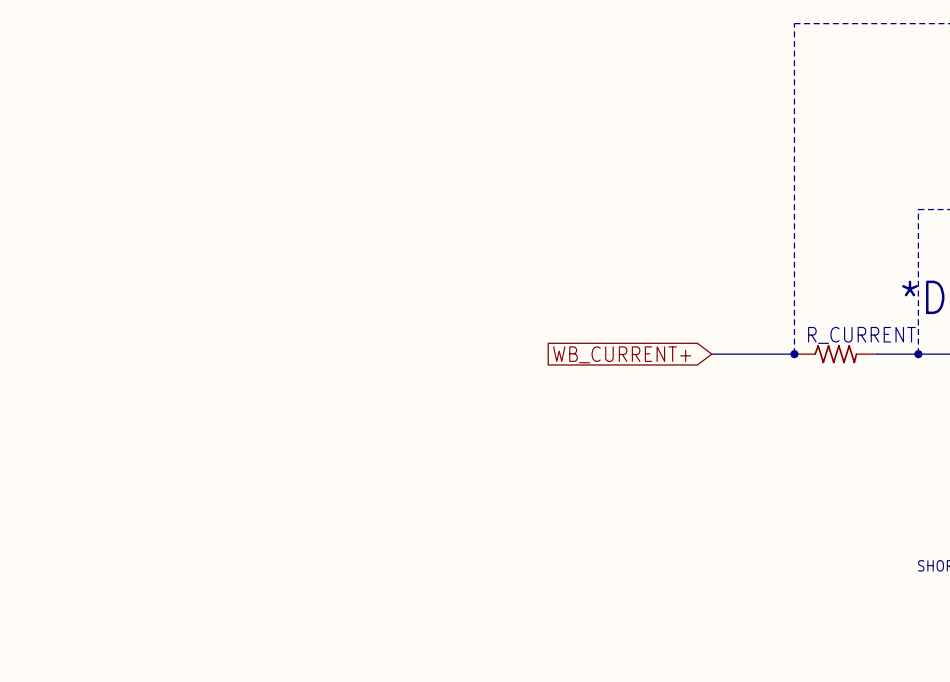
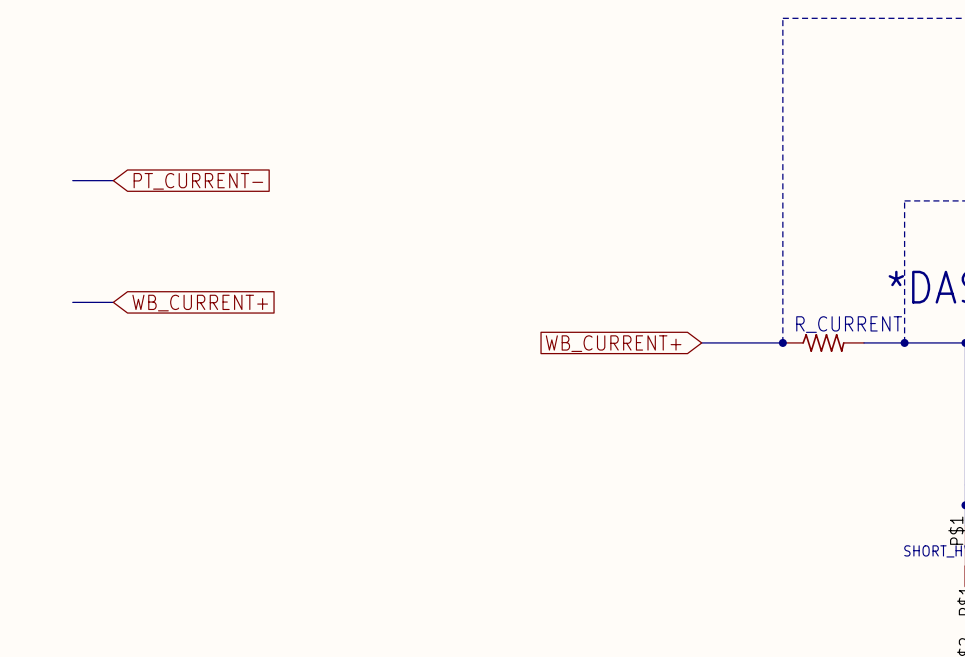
wire: none -> (72, 180) (113, 180)
global label: none -> PT_CURRENT- (198, 181)
wire: none -> (72, 302) (113, 302)
global label: none -> WB_CURRENT+ (200, 303)

